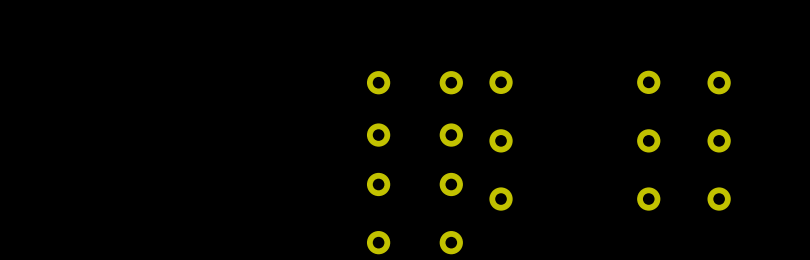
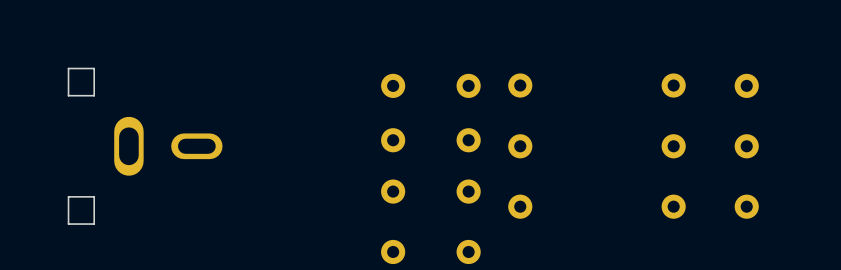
part: none -> (145, 146)

